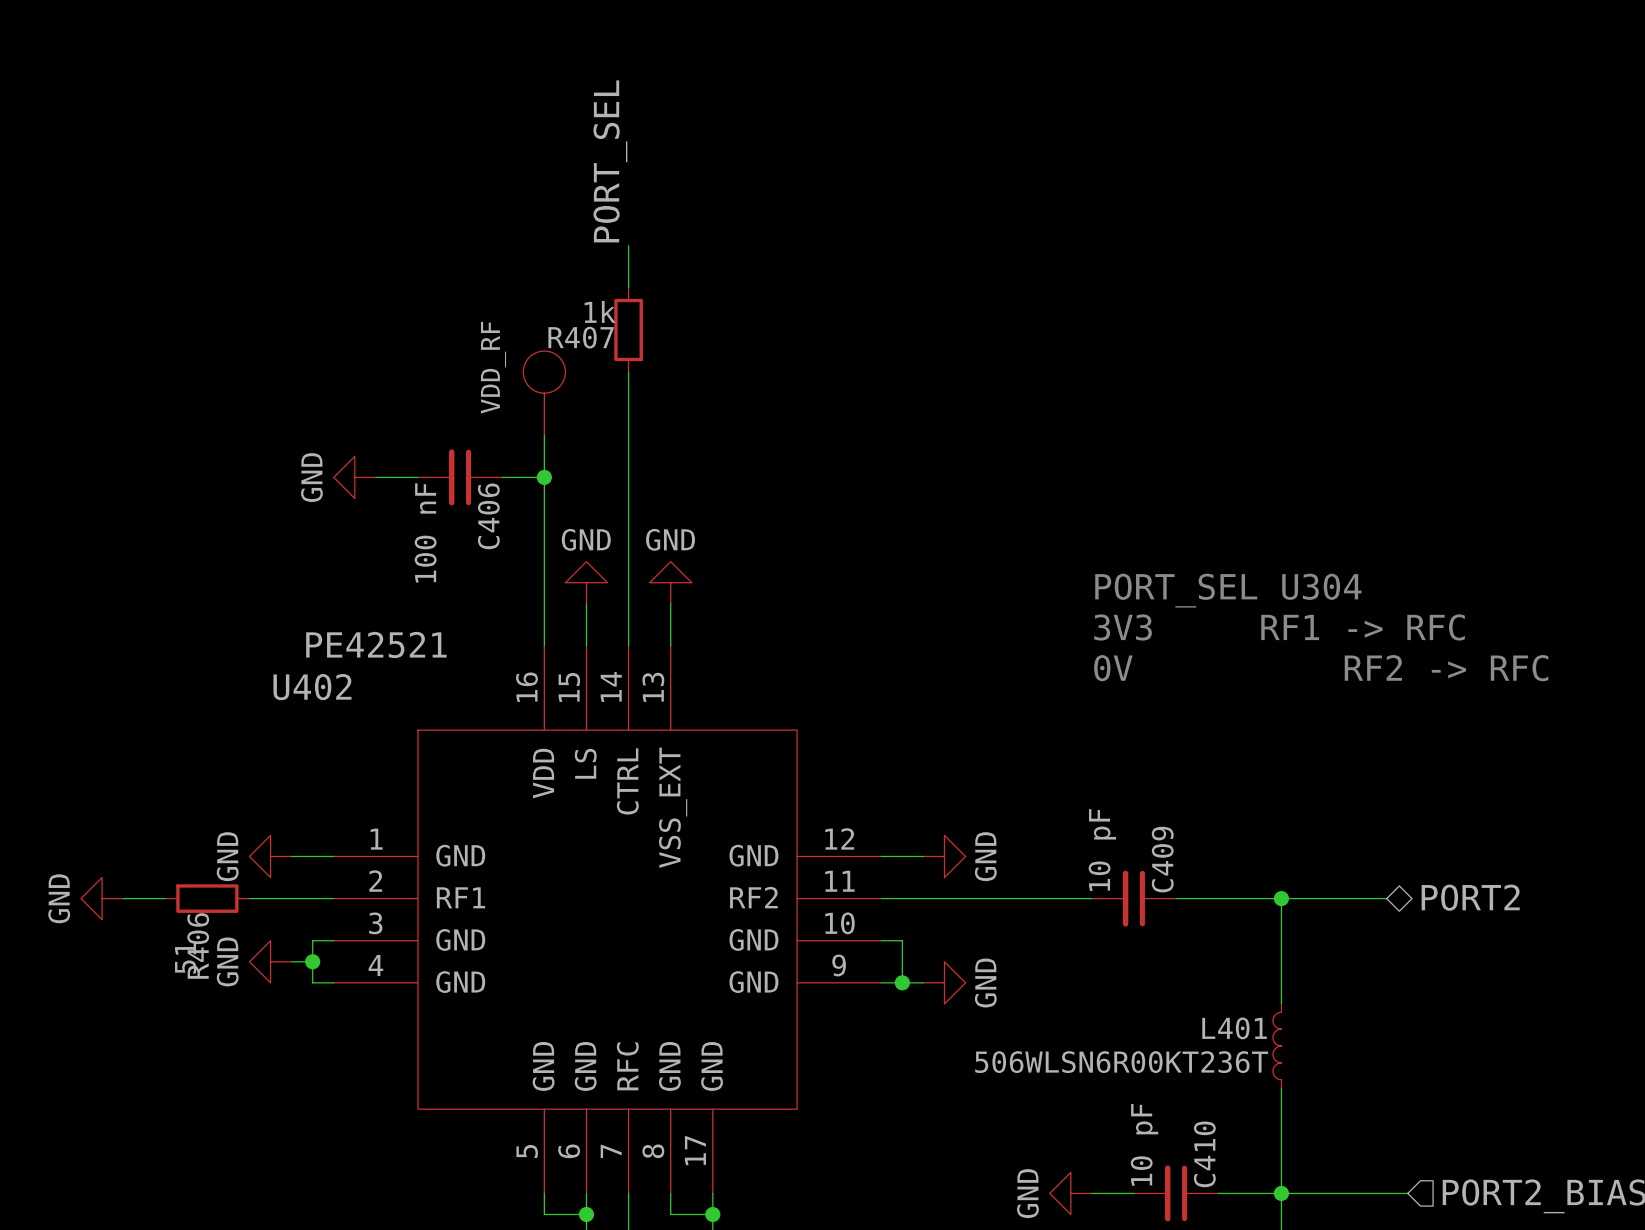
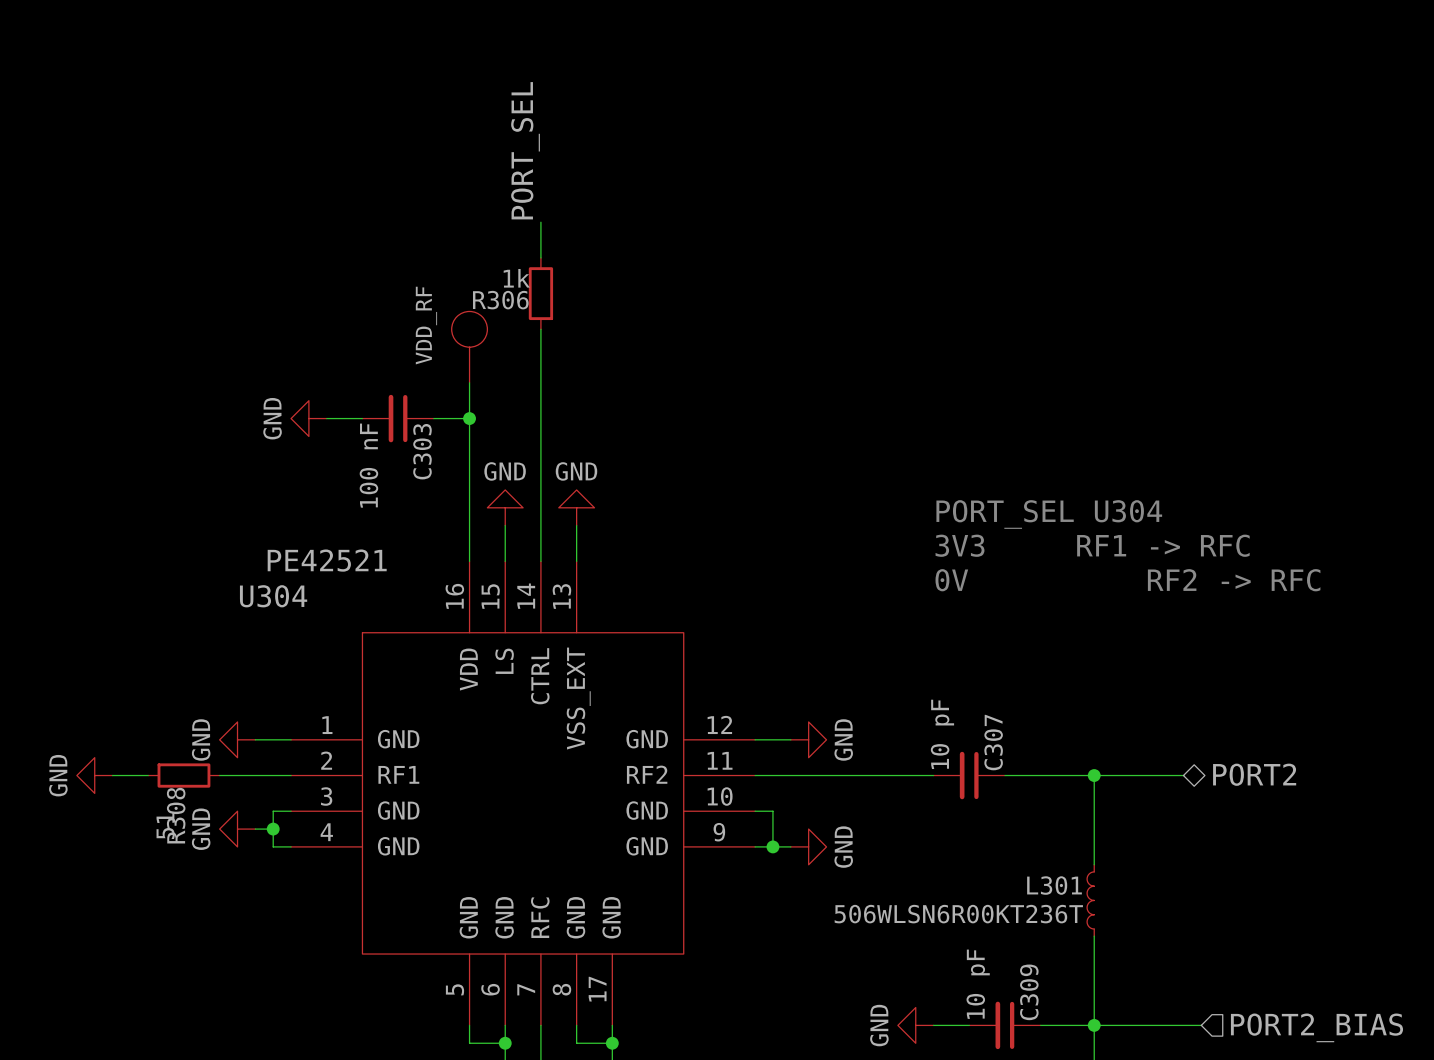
R407 name: R407 (581, 337) -> R306 (500, 300)
C406 name: C406 (488, 516) -> C303 (422, 451)
U402 name: U402 (312, 687) -> U304 (273, 596)
C409 name: C409 (1162, 859) -> C307 (993, 742)
R406 name: R406 (198, 945) -> R308 (176, 815)
L401 name: L401 (1234, 1028) -> L301 (1054, 885)
C410 name: C410 (1204, 1154) -> C309 (1029, 992)

